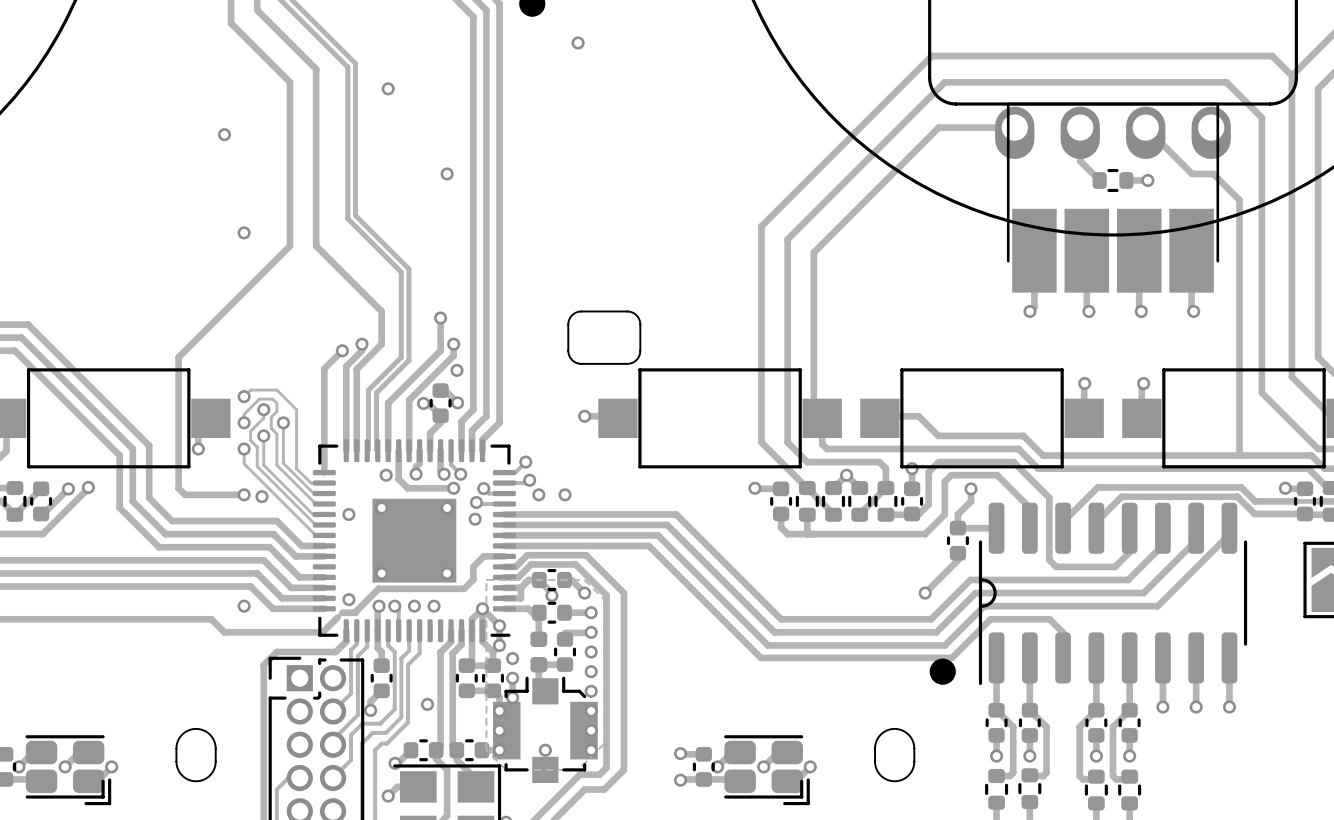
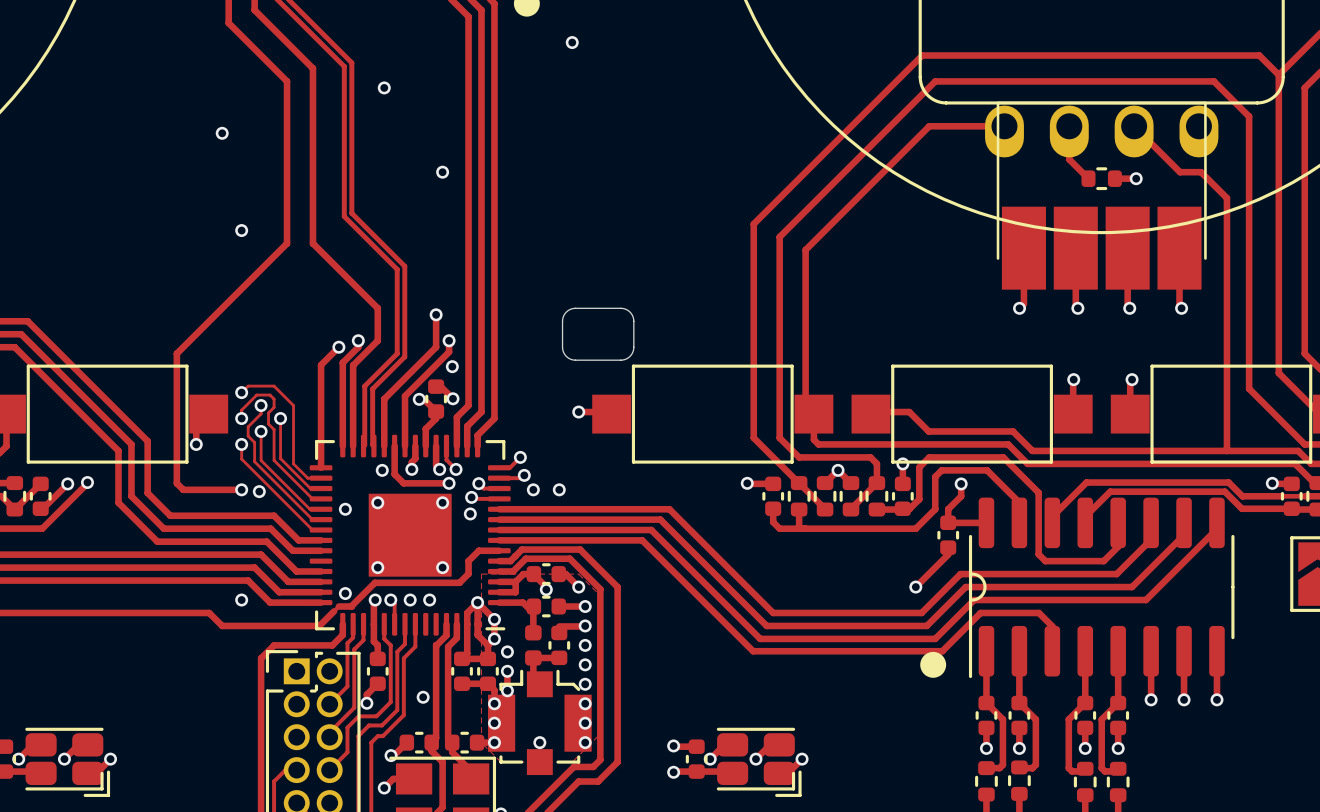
board edge: (176, 748) (176, 766) (184, 777) (191, 780) (200, 780) (212, 772) (215, 764) (215, 746) (213, 739) (207, 732) (196, 728) (186, 731) (178, 739) (176, 748) -> none
board edge: (875, 748) (875, 766) (884, 778) (899, 780) (911, 771) (914, 764) (914, 746) (912, 739) (905, 732) (897, 729) (885, 731) (877, 739) (875, 748) -> none

